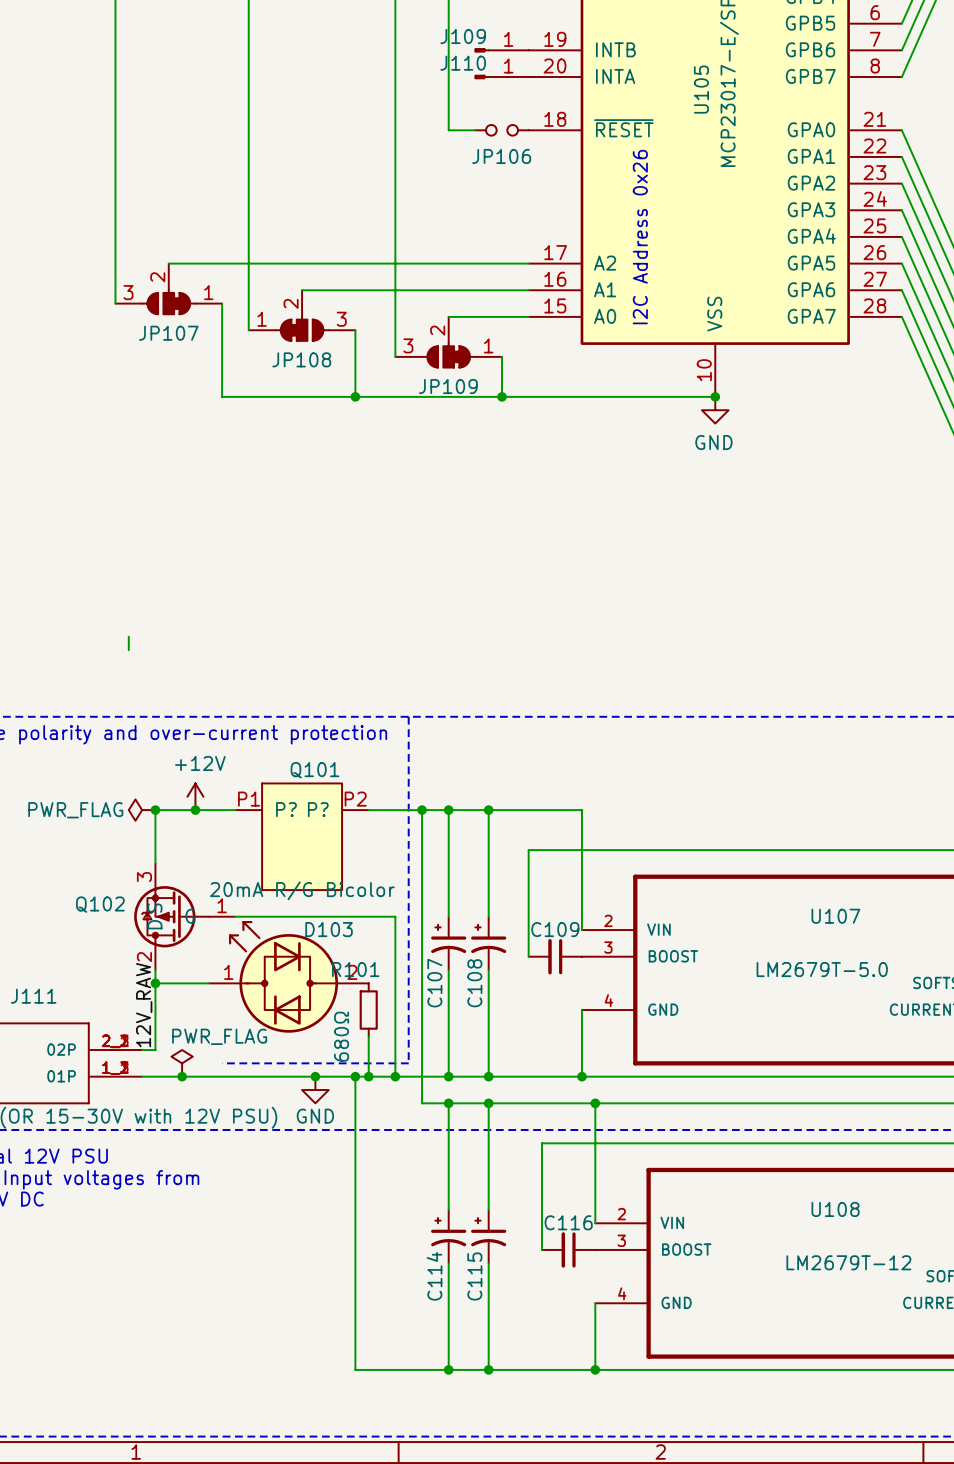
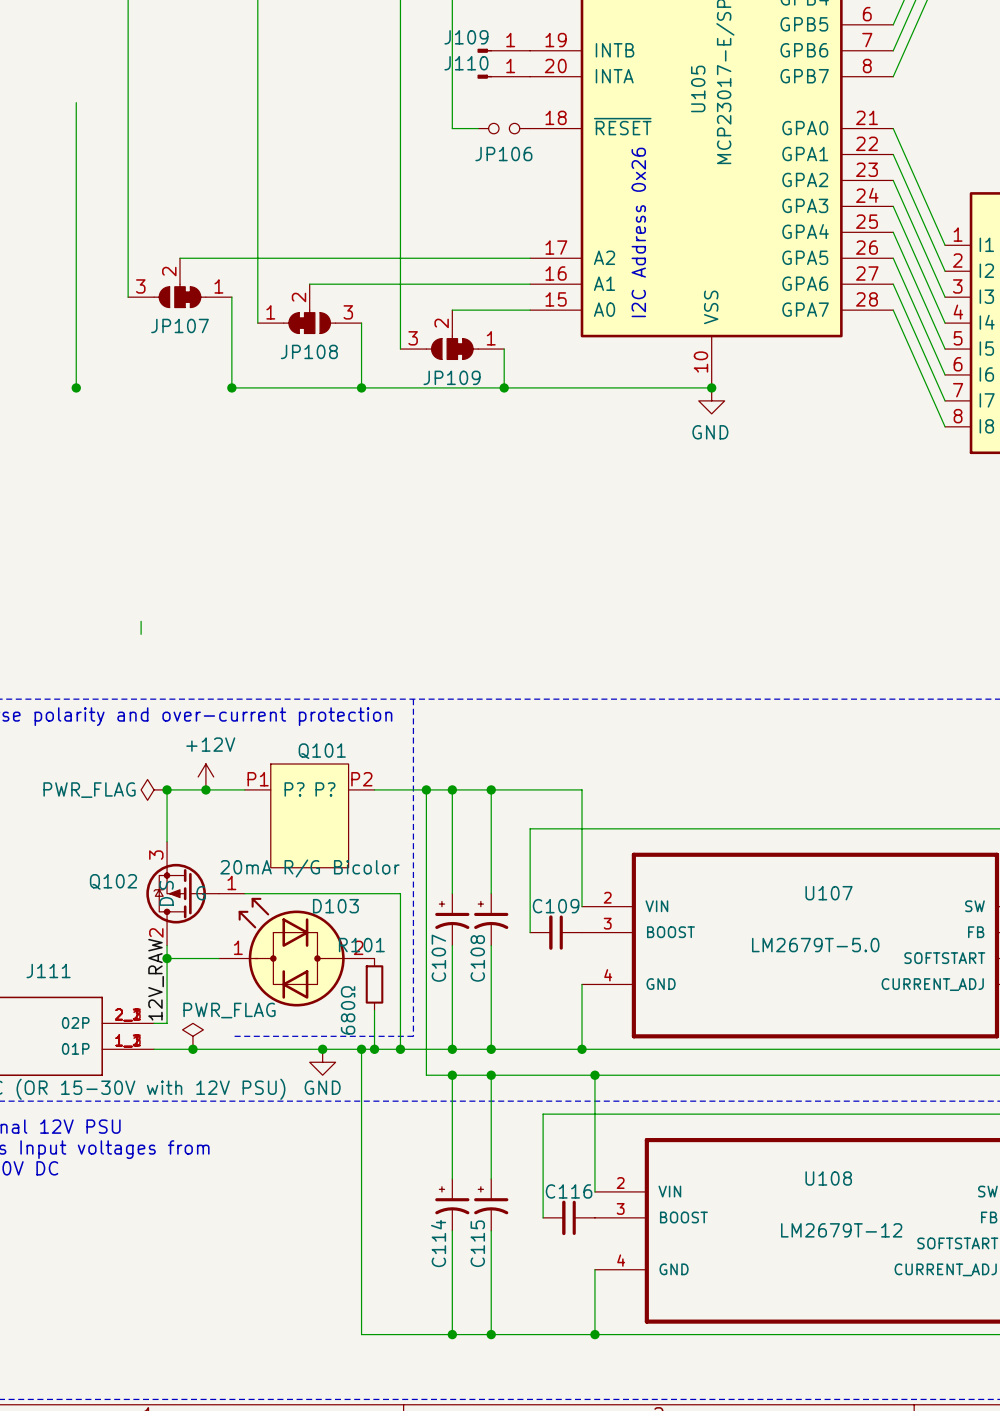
wire: none -> (76, 102) (76, 387)
junction: none -> (76, 387)
junction: none -> (231, 387)

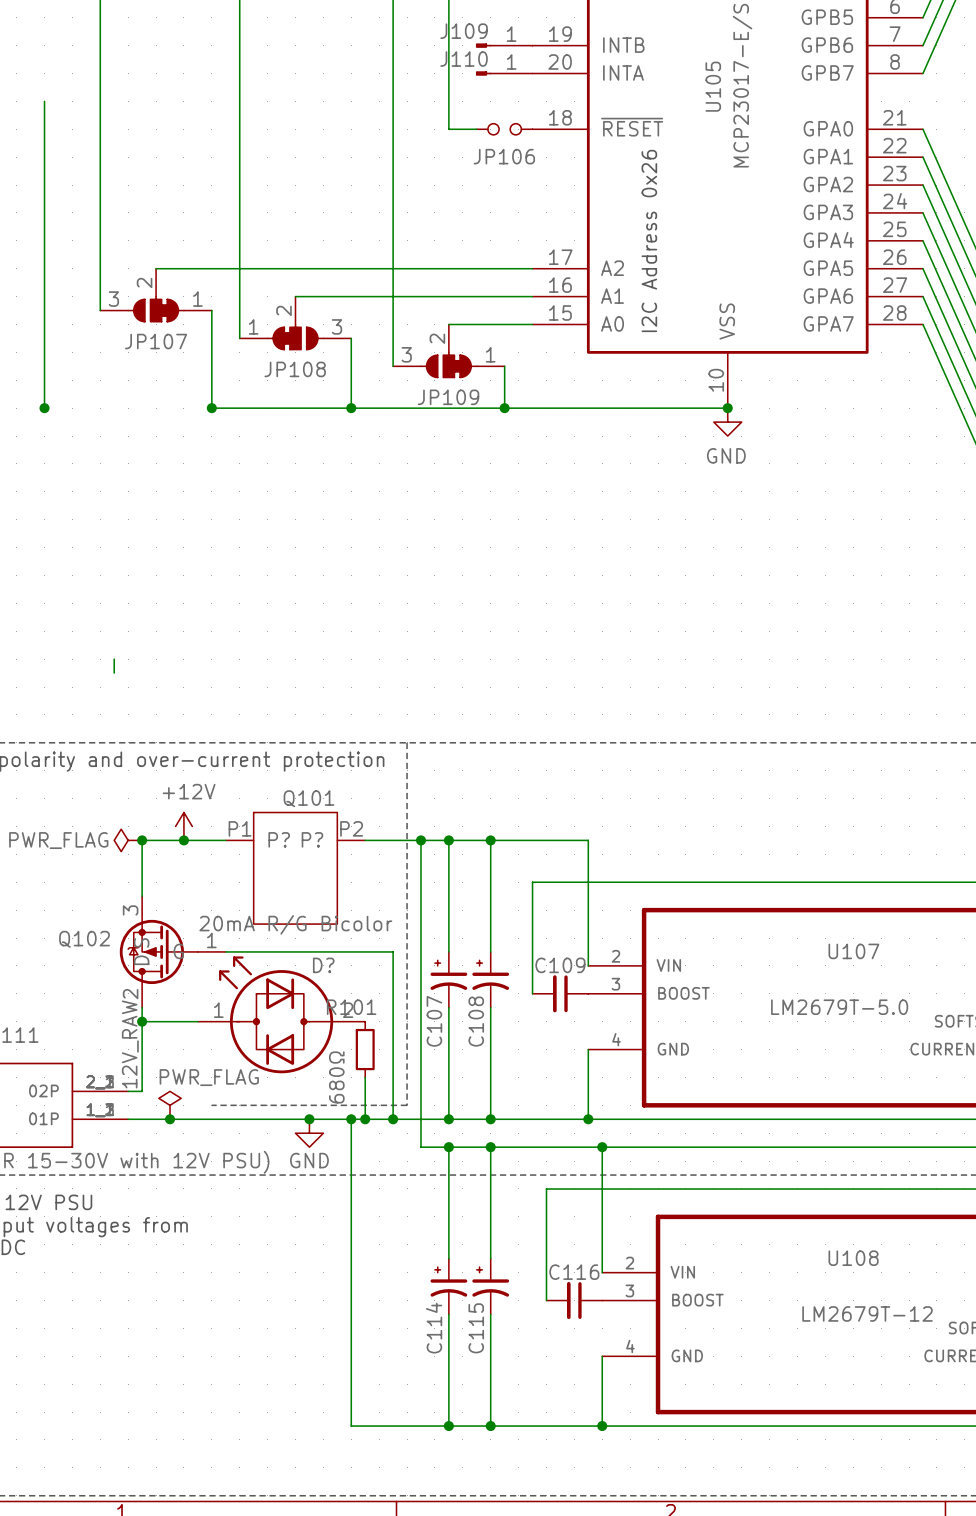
D103 name: D103 (335, 906) -> D? (323, 965)

